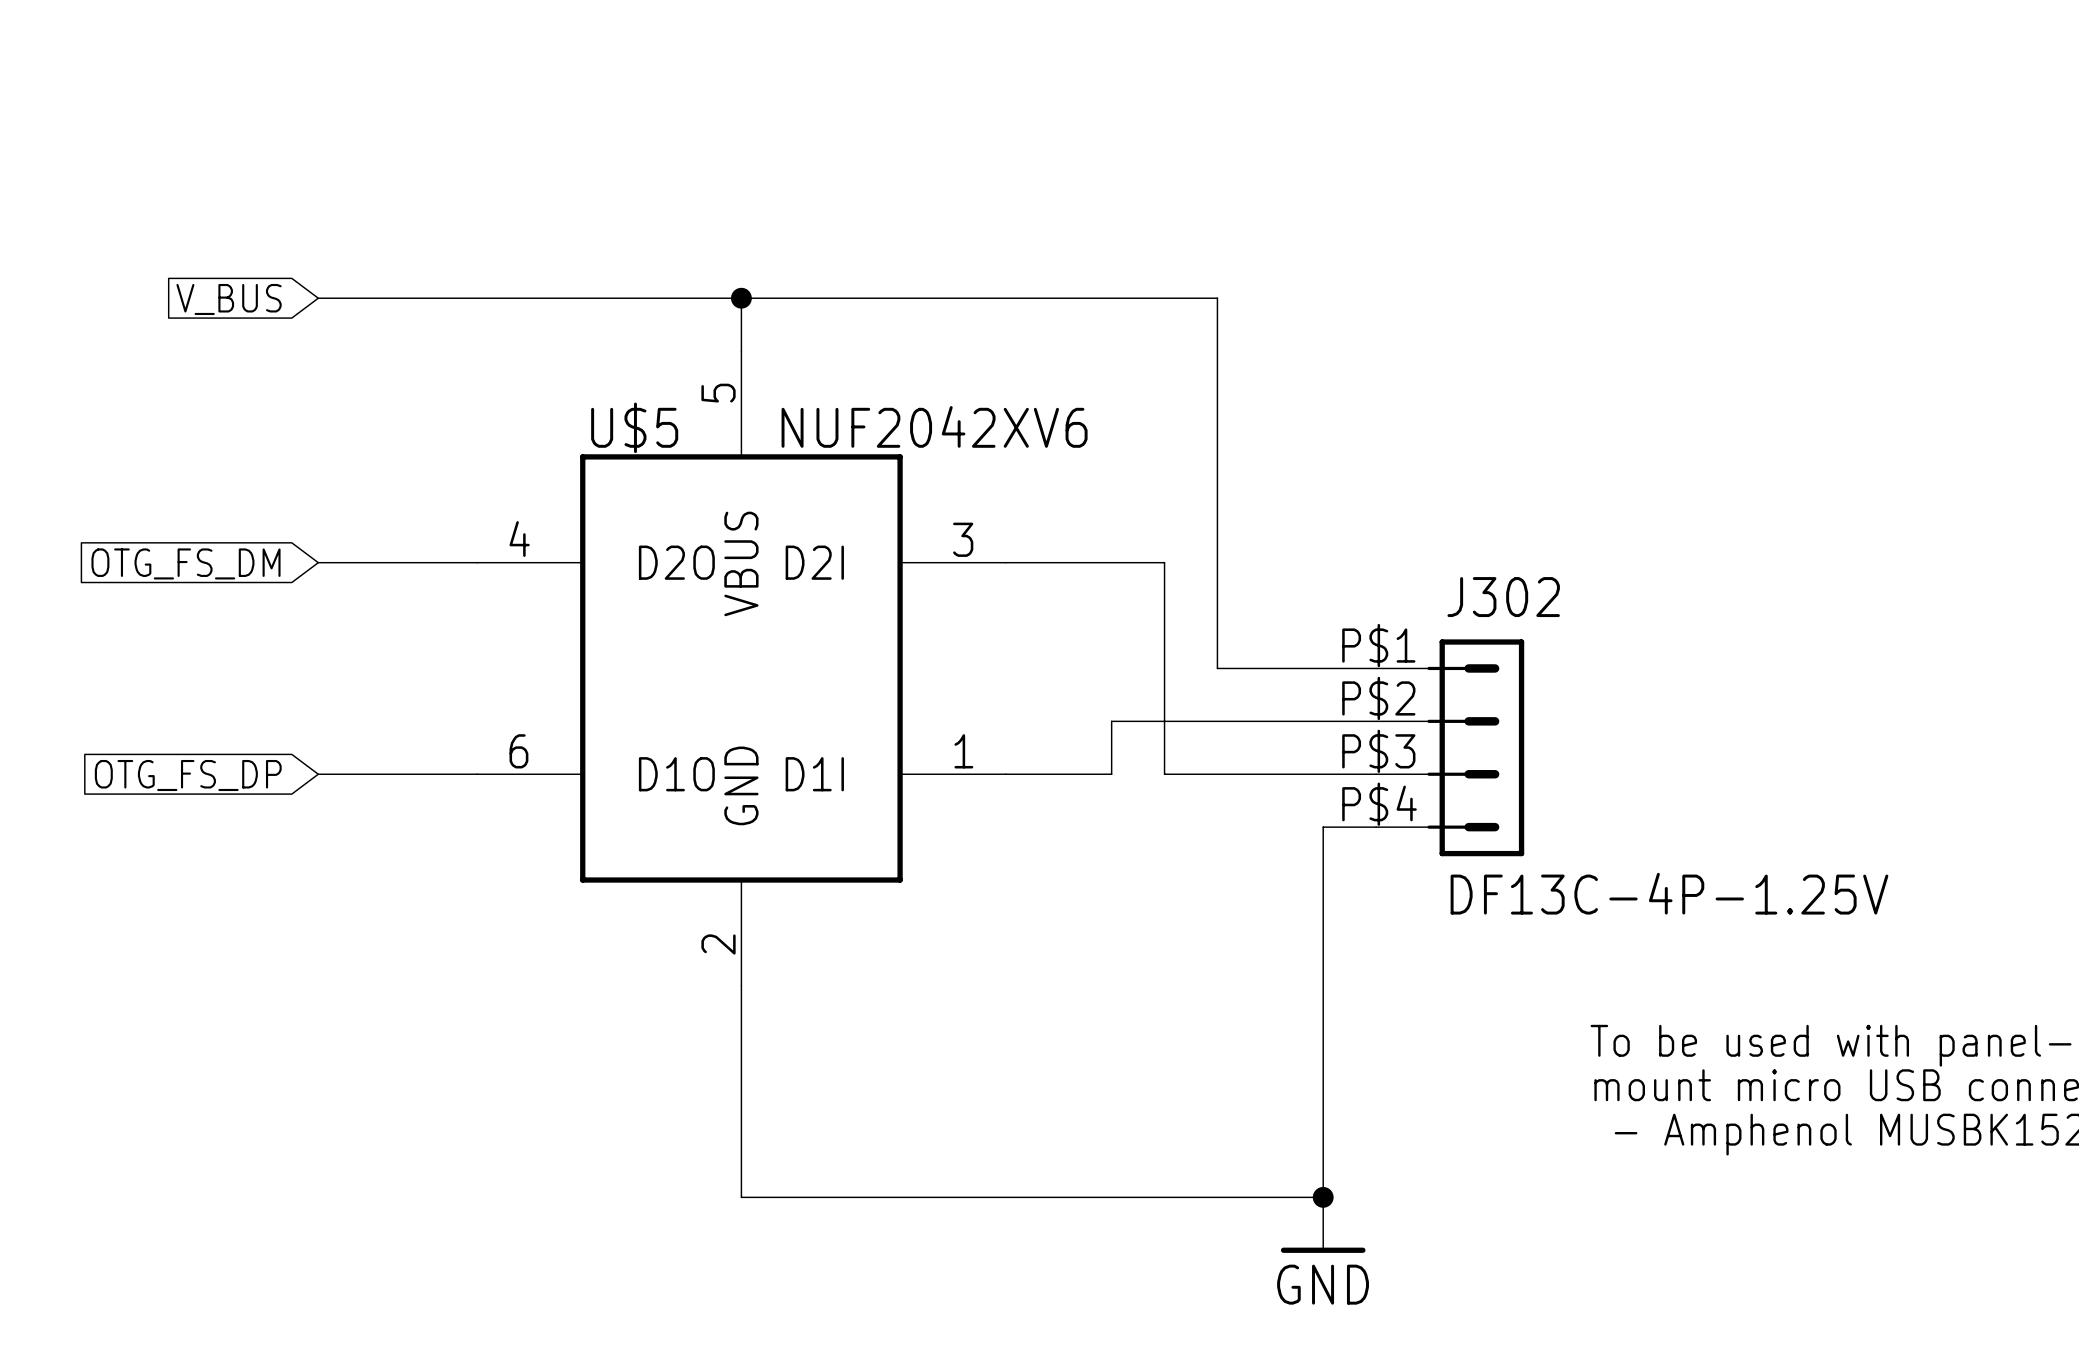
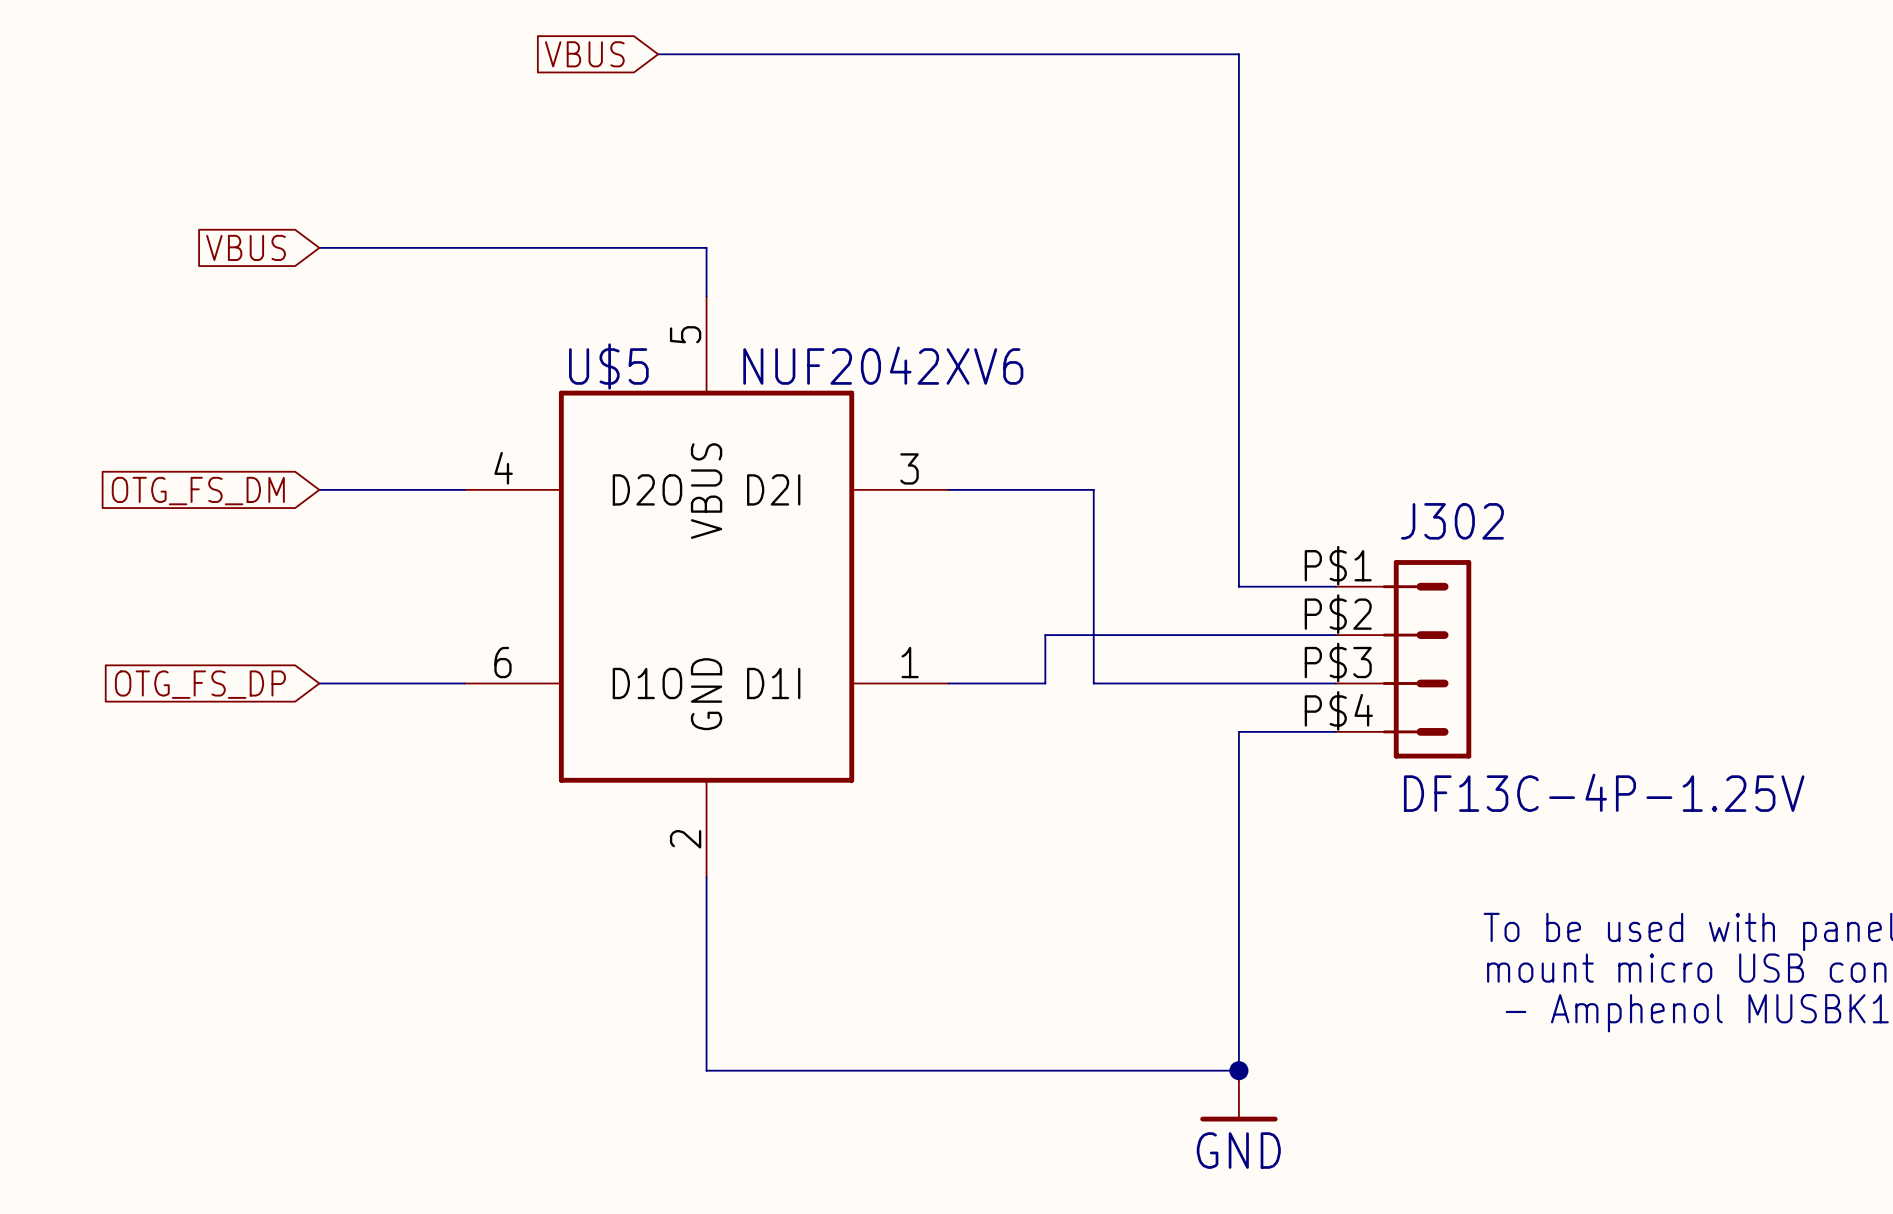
global label: none -> VBUS (584, 54)
wire: (741, 298) (1217, 298) (1217, 668) (1323, 668) -> (658, 54) (1238, 54) (1238, 586)
junction: (741, 298) -> none
global label: V_BUS (229, 299) -> VBUS (246, 247)
J302 position: (1450, 747) -> (1403, 659)

